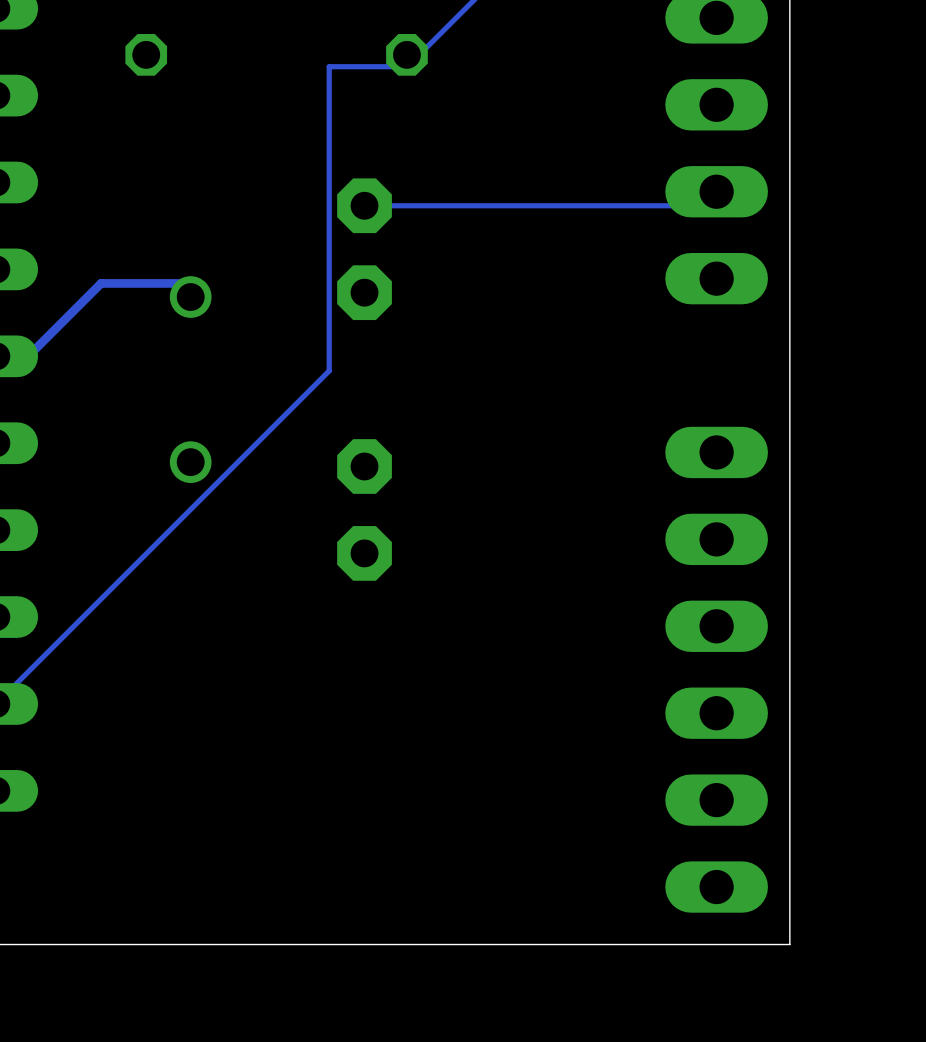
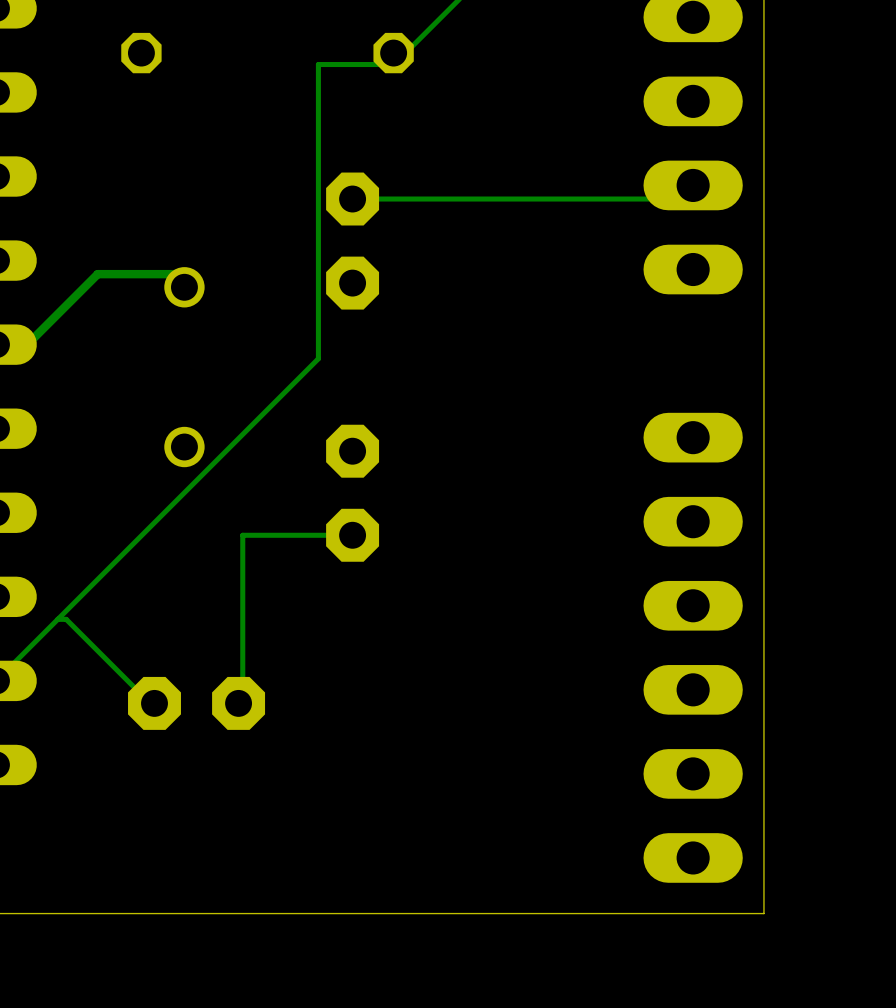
track: none -> (352, 535) (242, 535) (242, 703) (238, 703)
track: none -> (57, 619) (66, 619) (150, 703) (154, 703)
part: none -> (196, 703)

